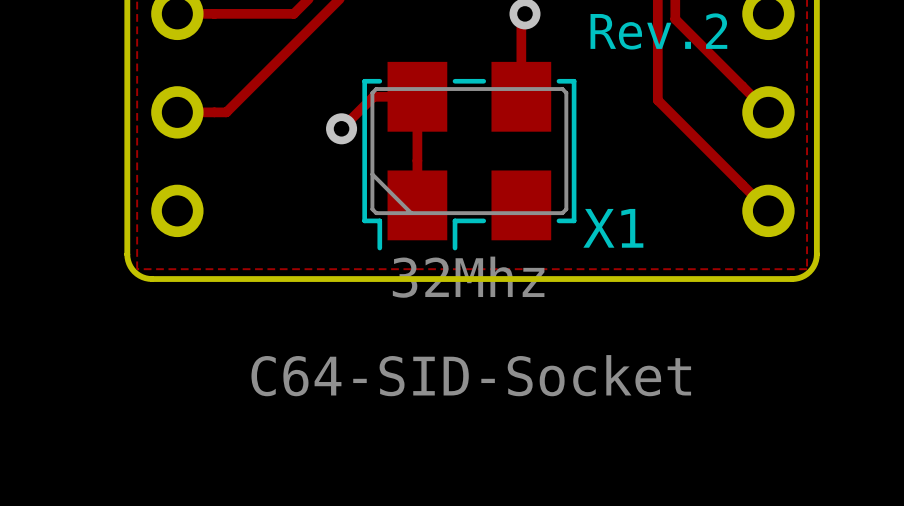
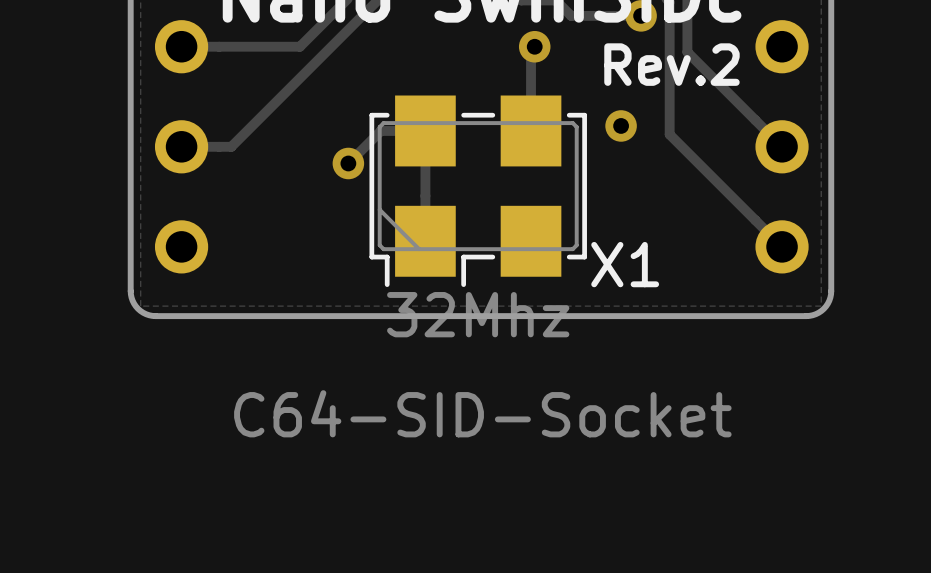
via: none -> (621, 125)

